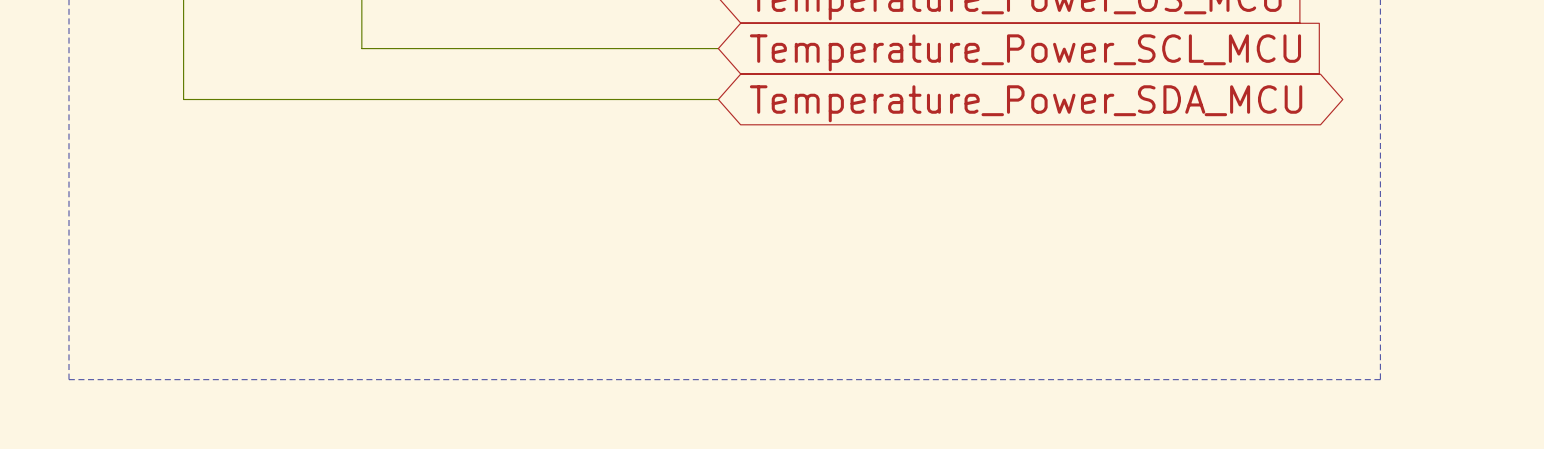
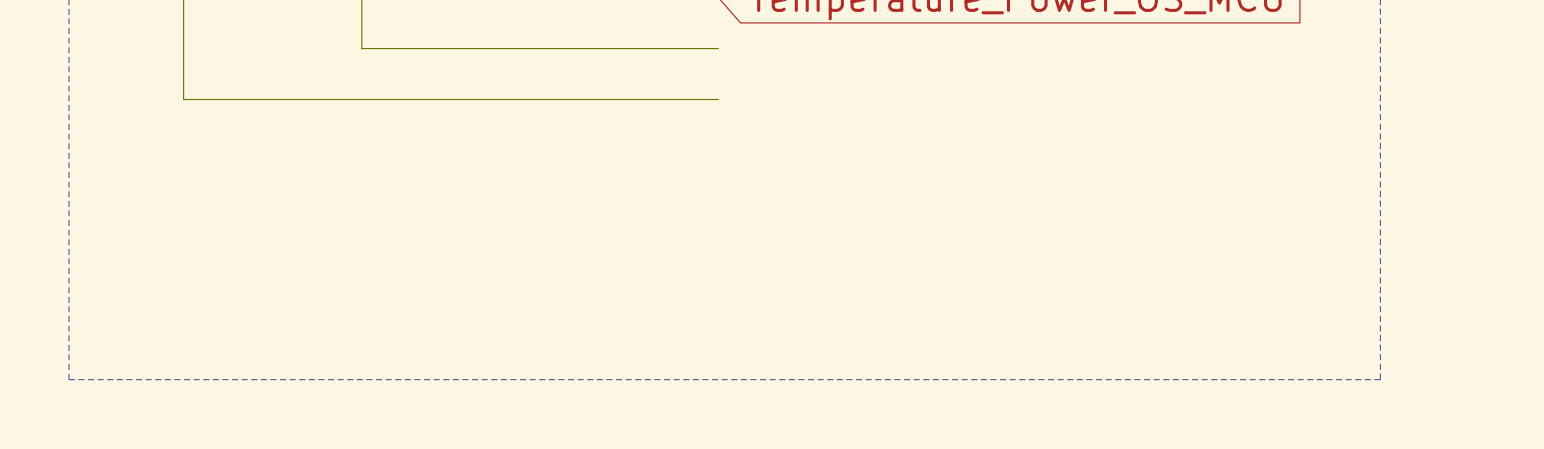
global label: Temperature_Power_SCL_MCU (1025, 52) -> none
global label: Temperature_Power_SDA_MCU (1026, 103) -> none

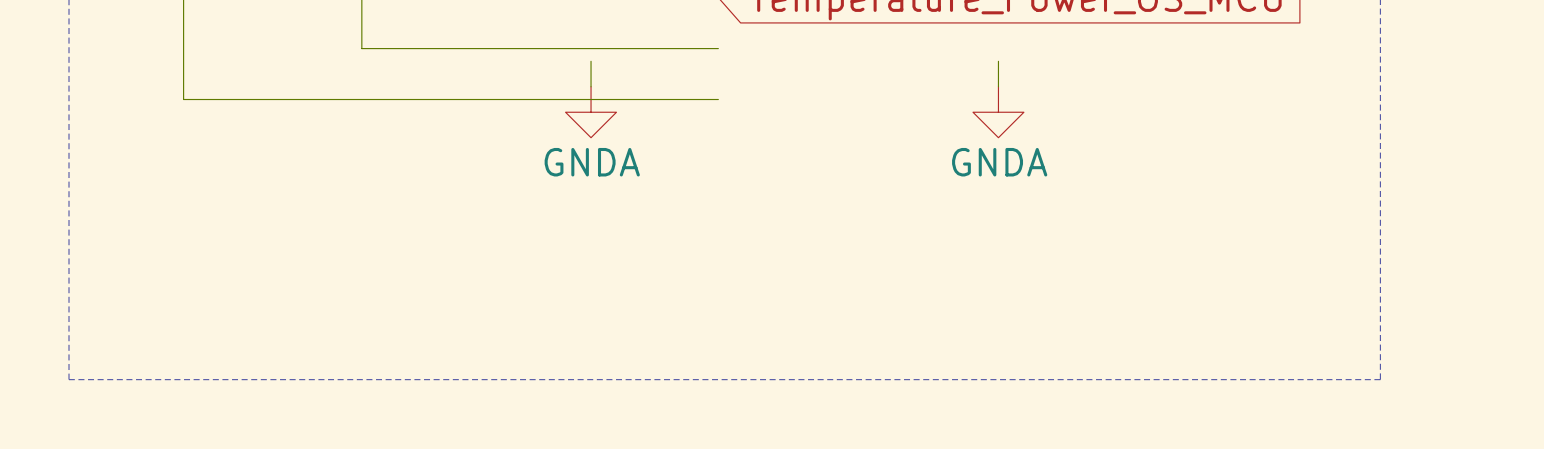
wire: none -> (591, 61) (591, 86)
wire: none -> (998, 61) (998, 86)
power symbol: none -> GNDA (591, 112)
power symbol: none -> GNDA (998, 112)

